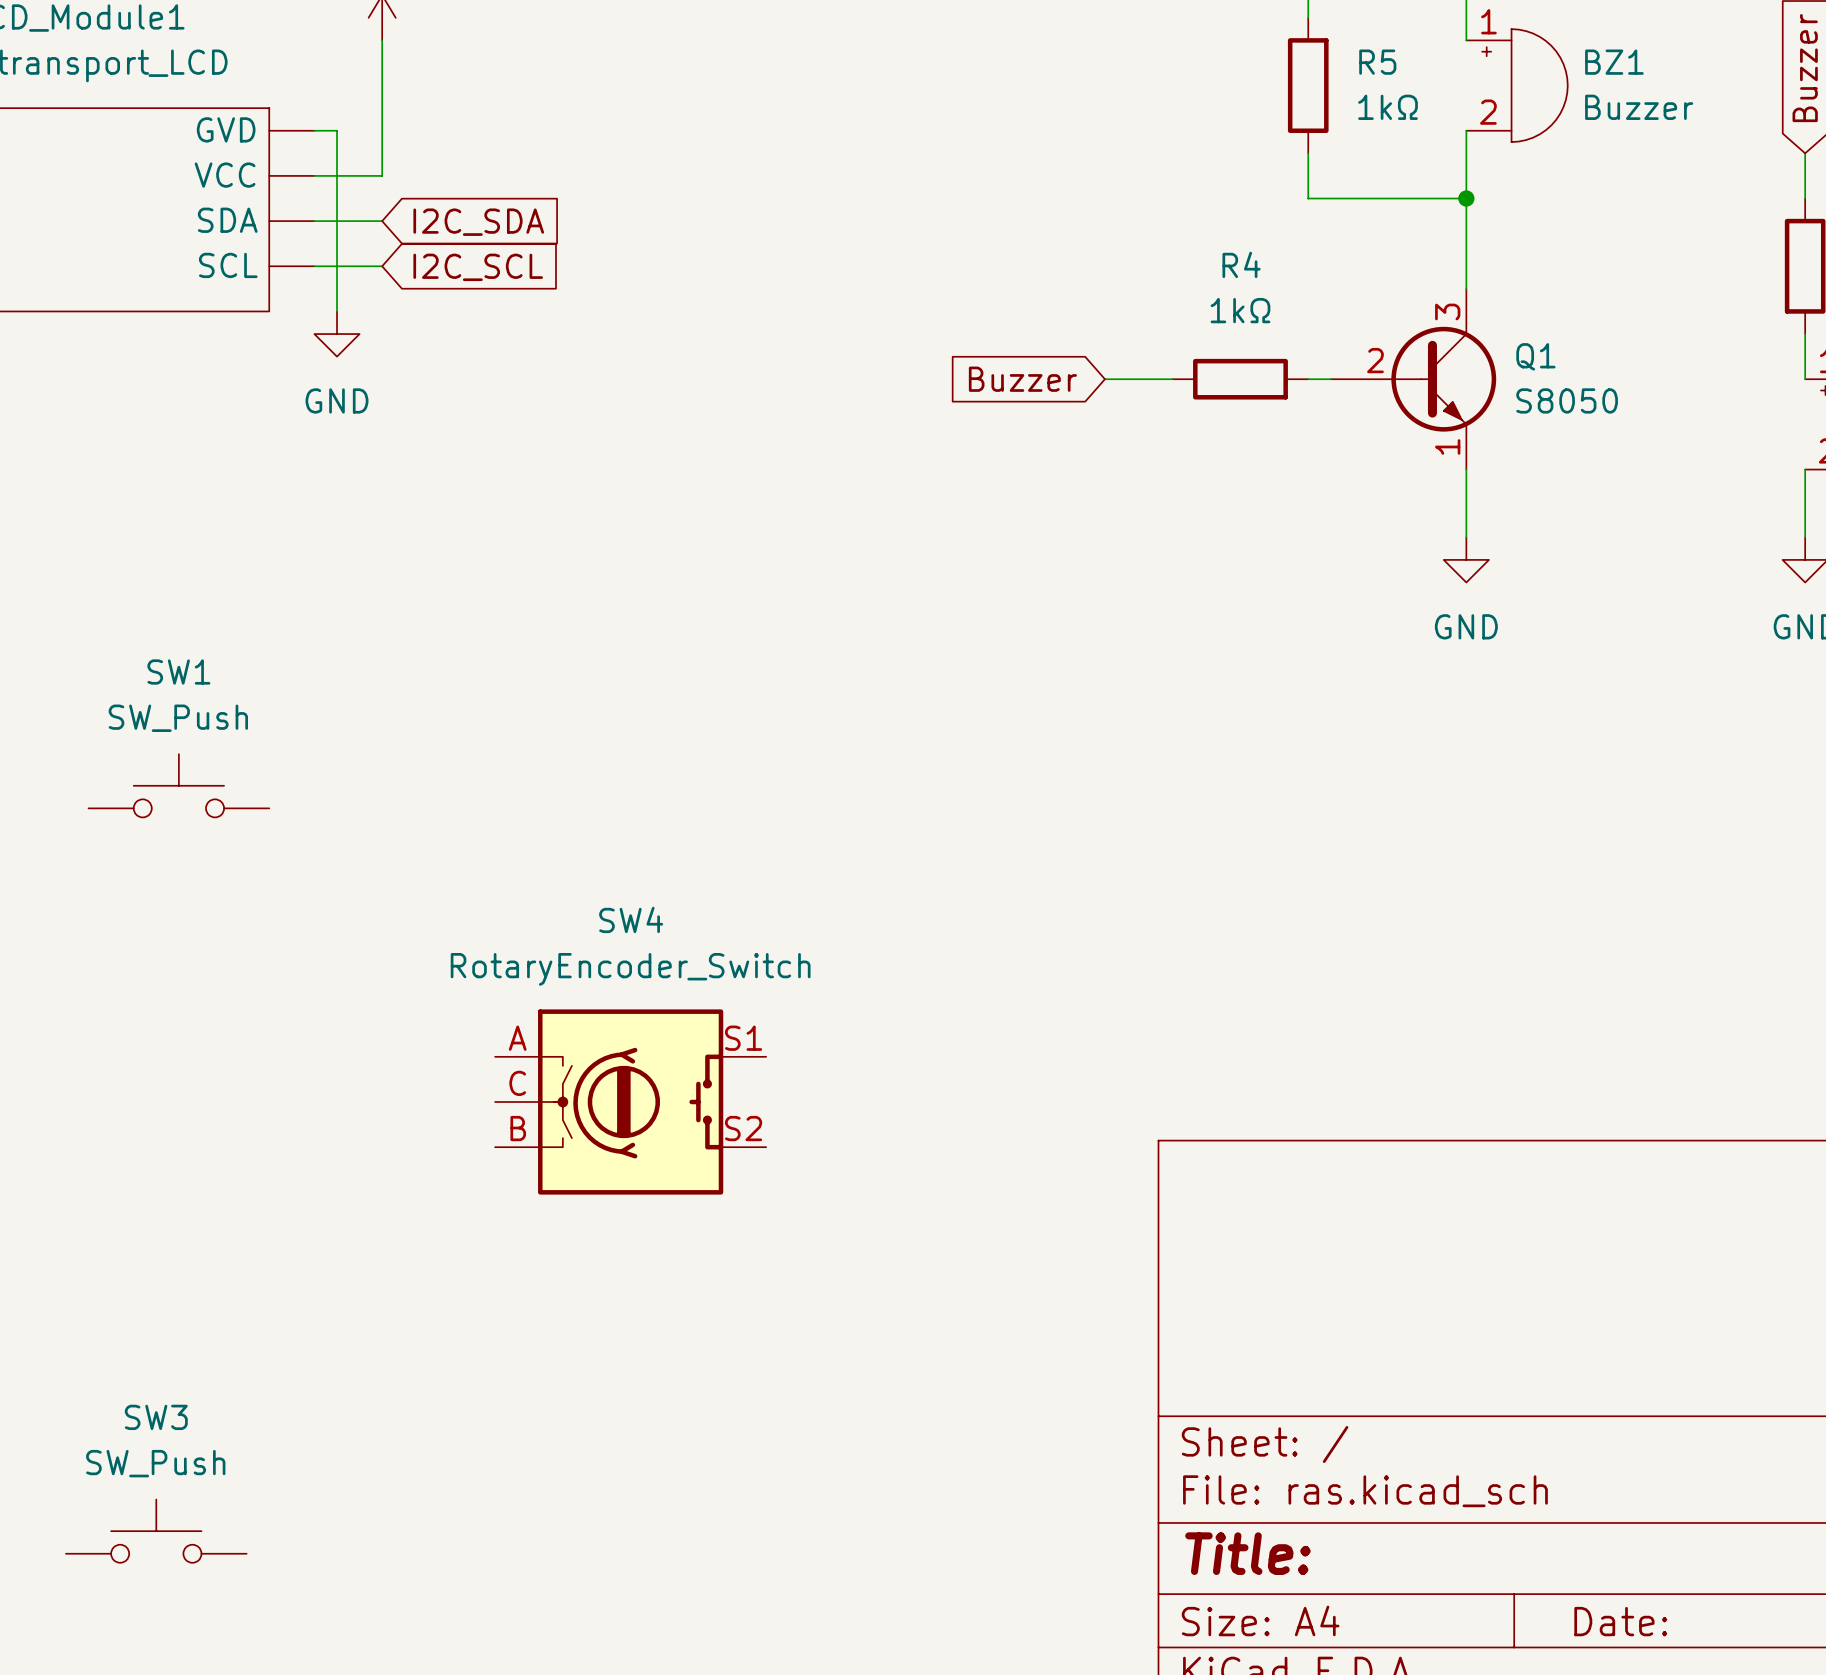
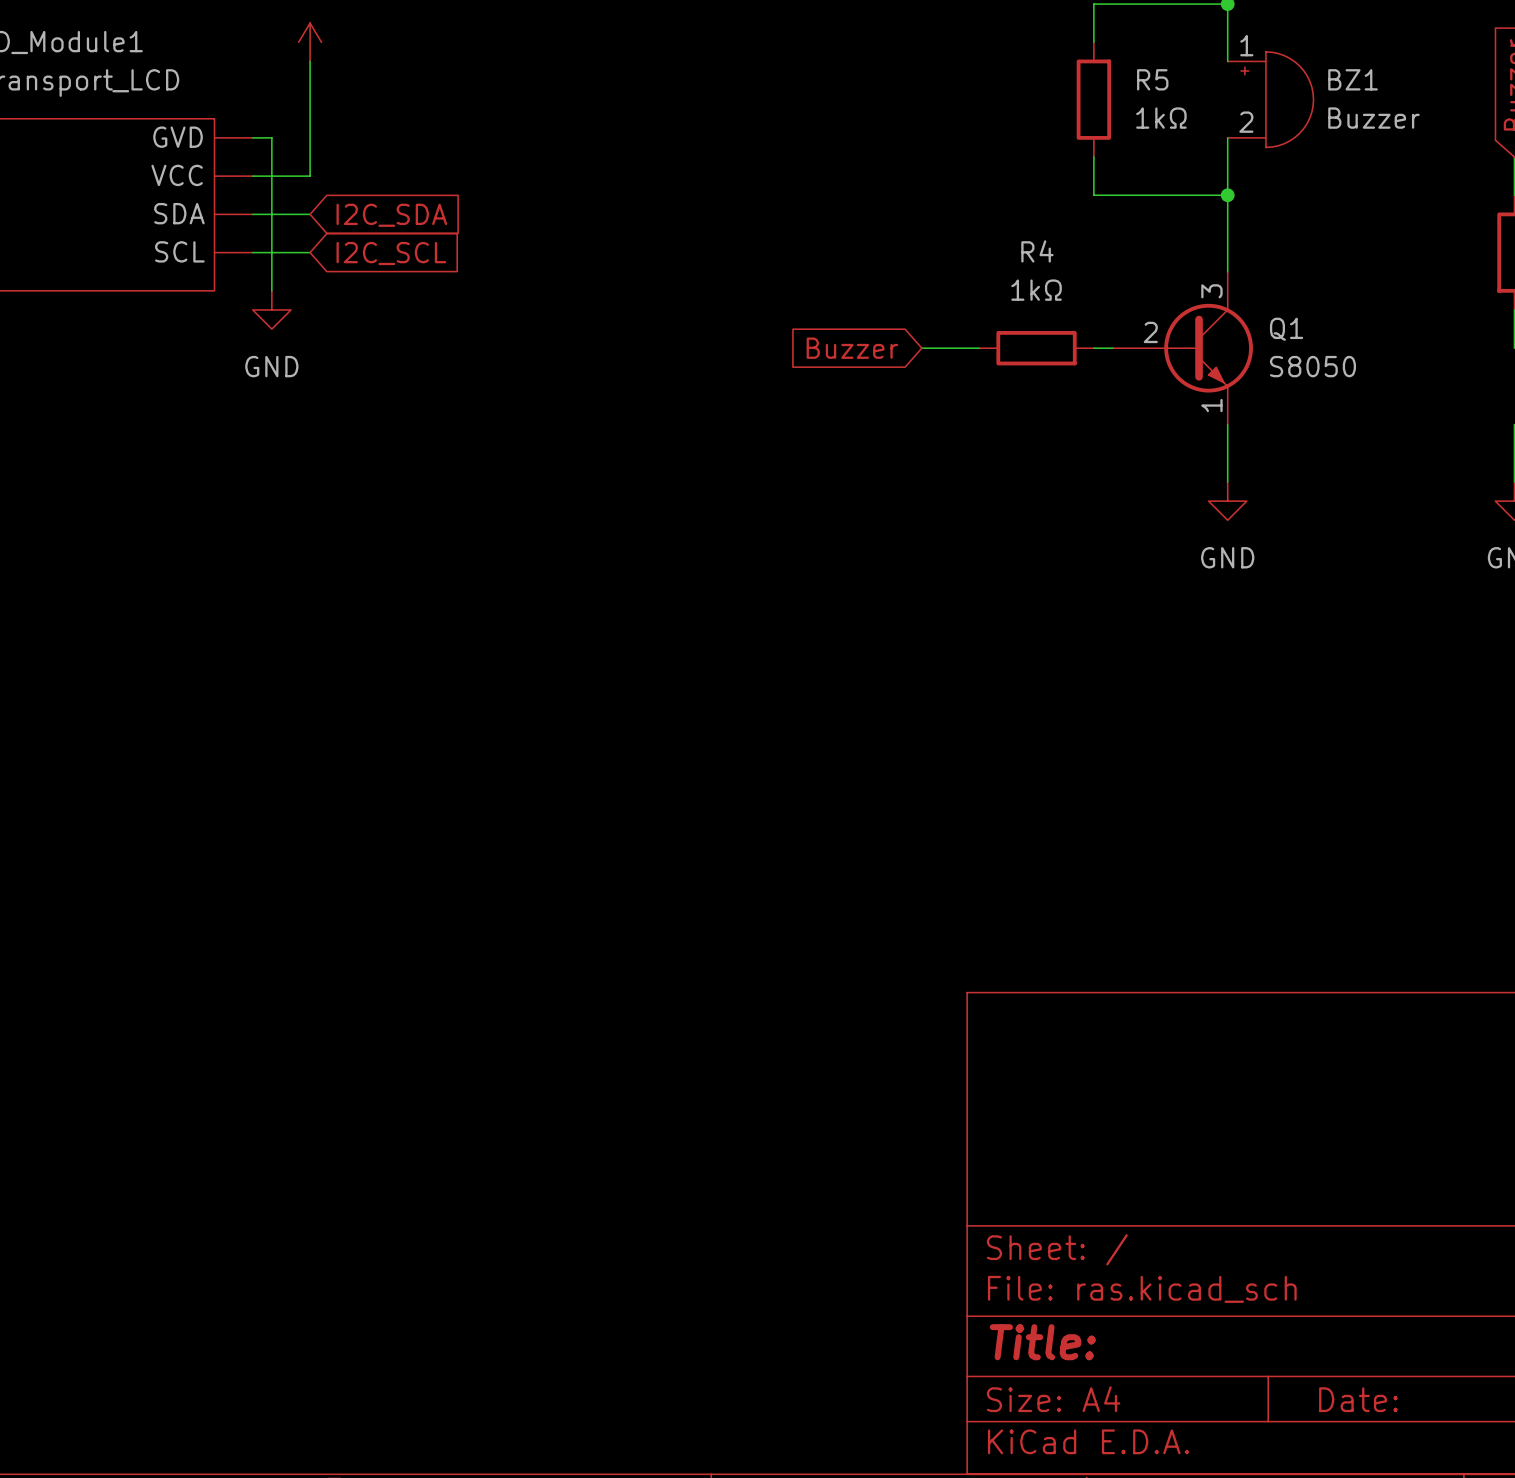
SW1: SW_Push (178, 785) -> none
SW4: RotaryEncoder_Switch (630, 1102) -> none
SW3: SW_Push (156, 1531) -> none

